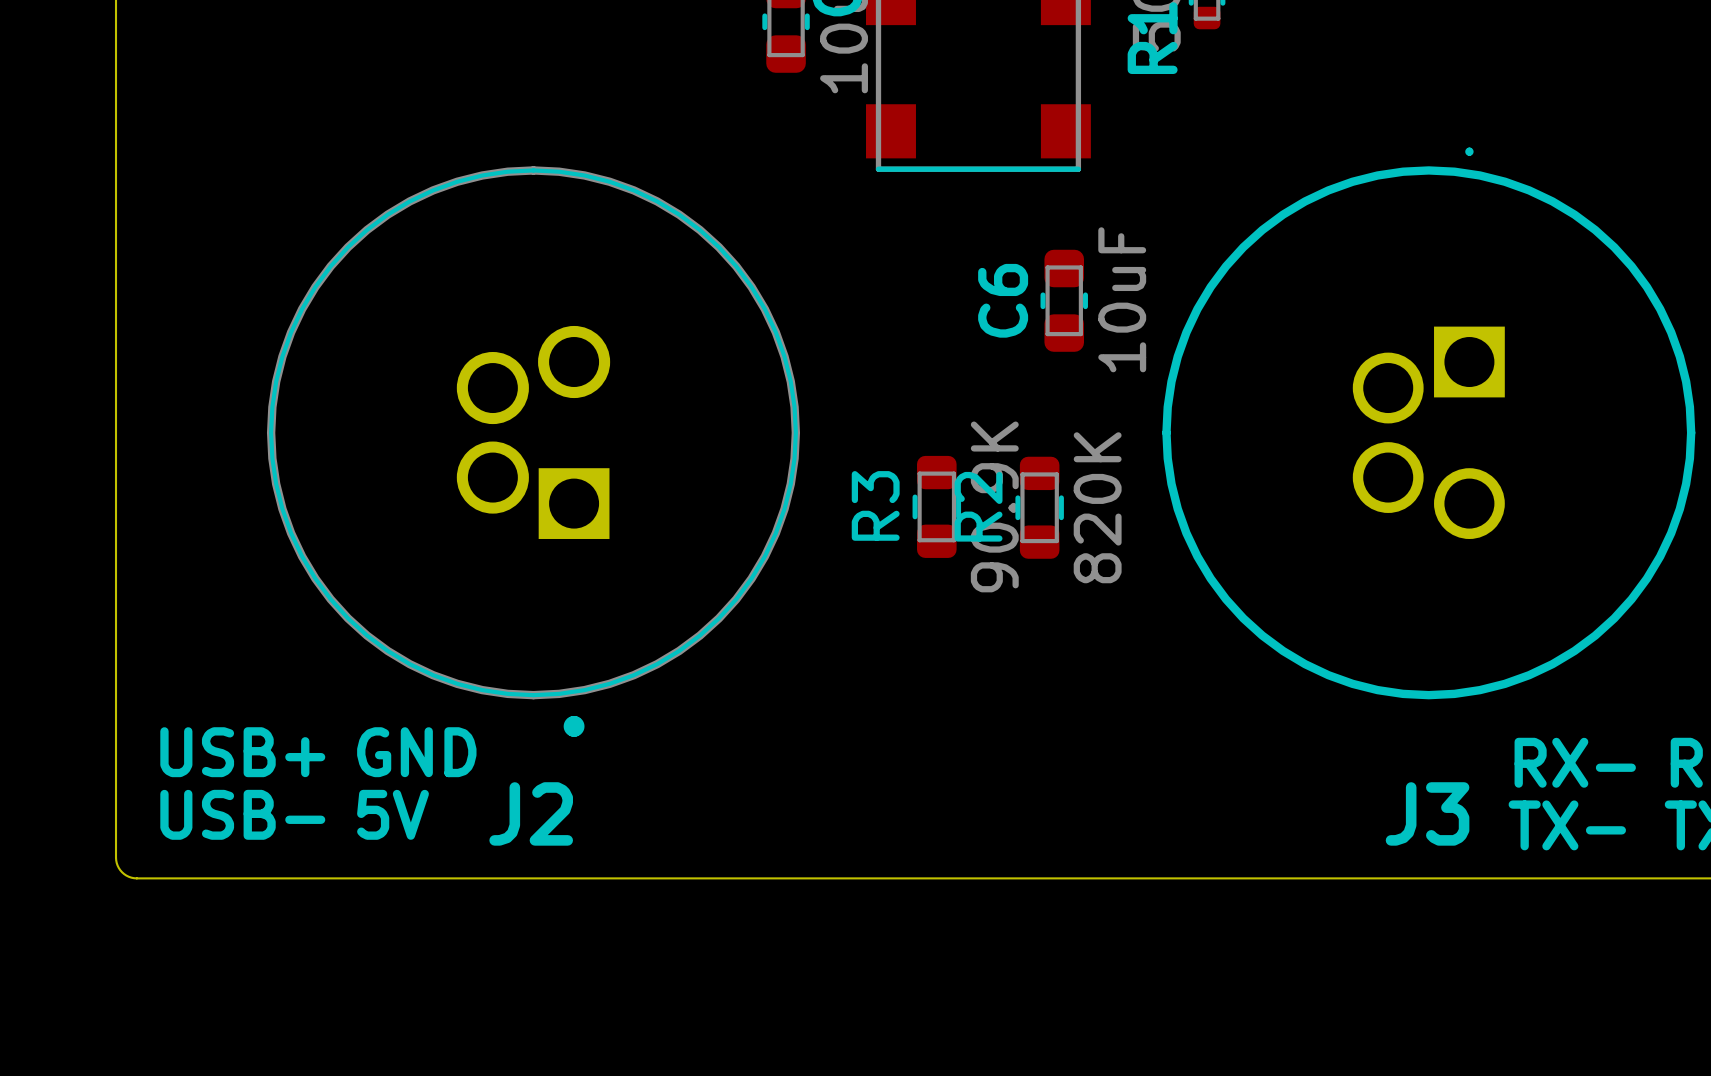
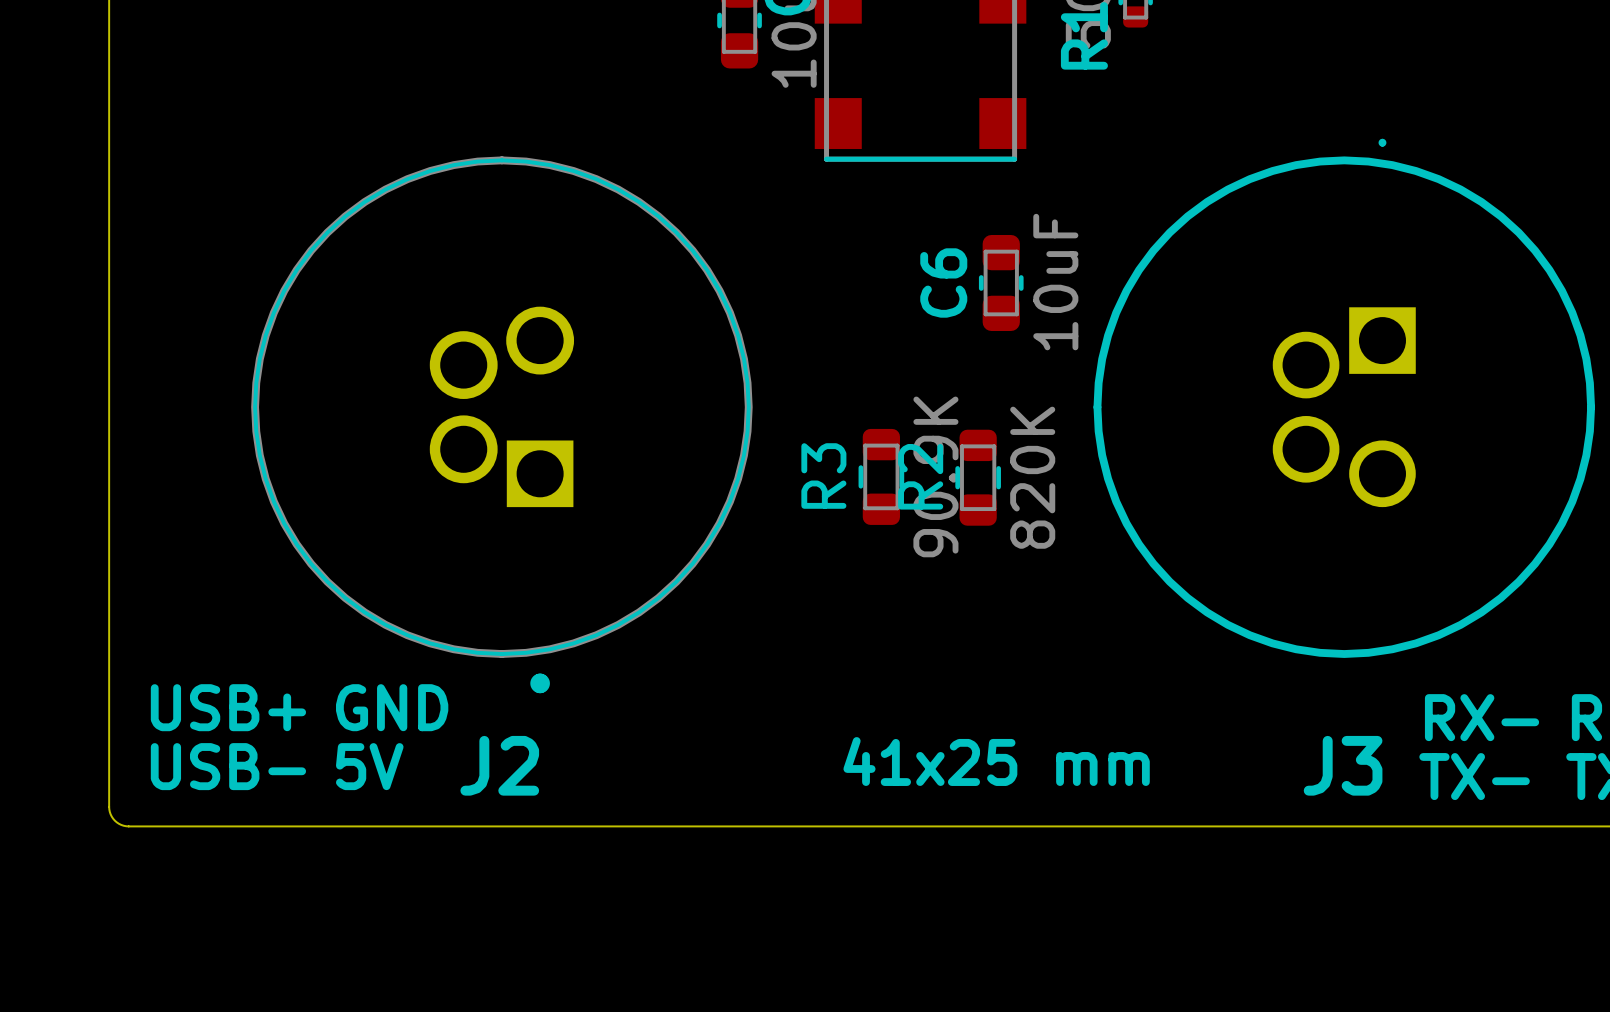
text: none -> 41x25 mm (996, 761)

